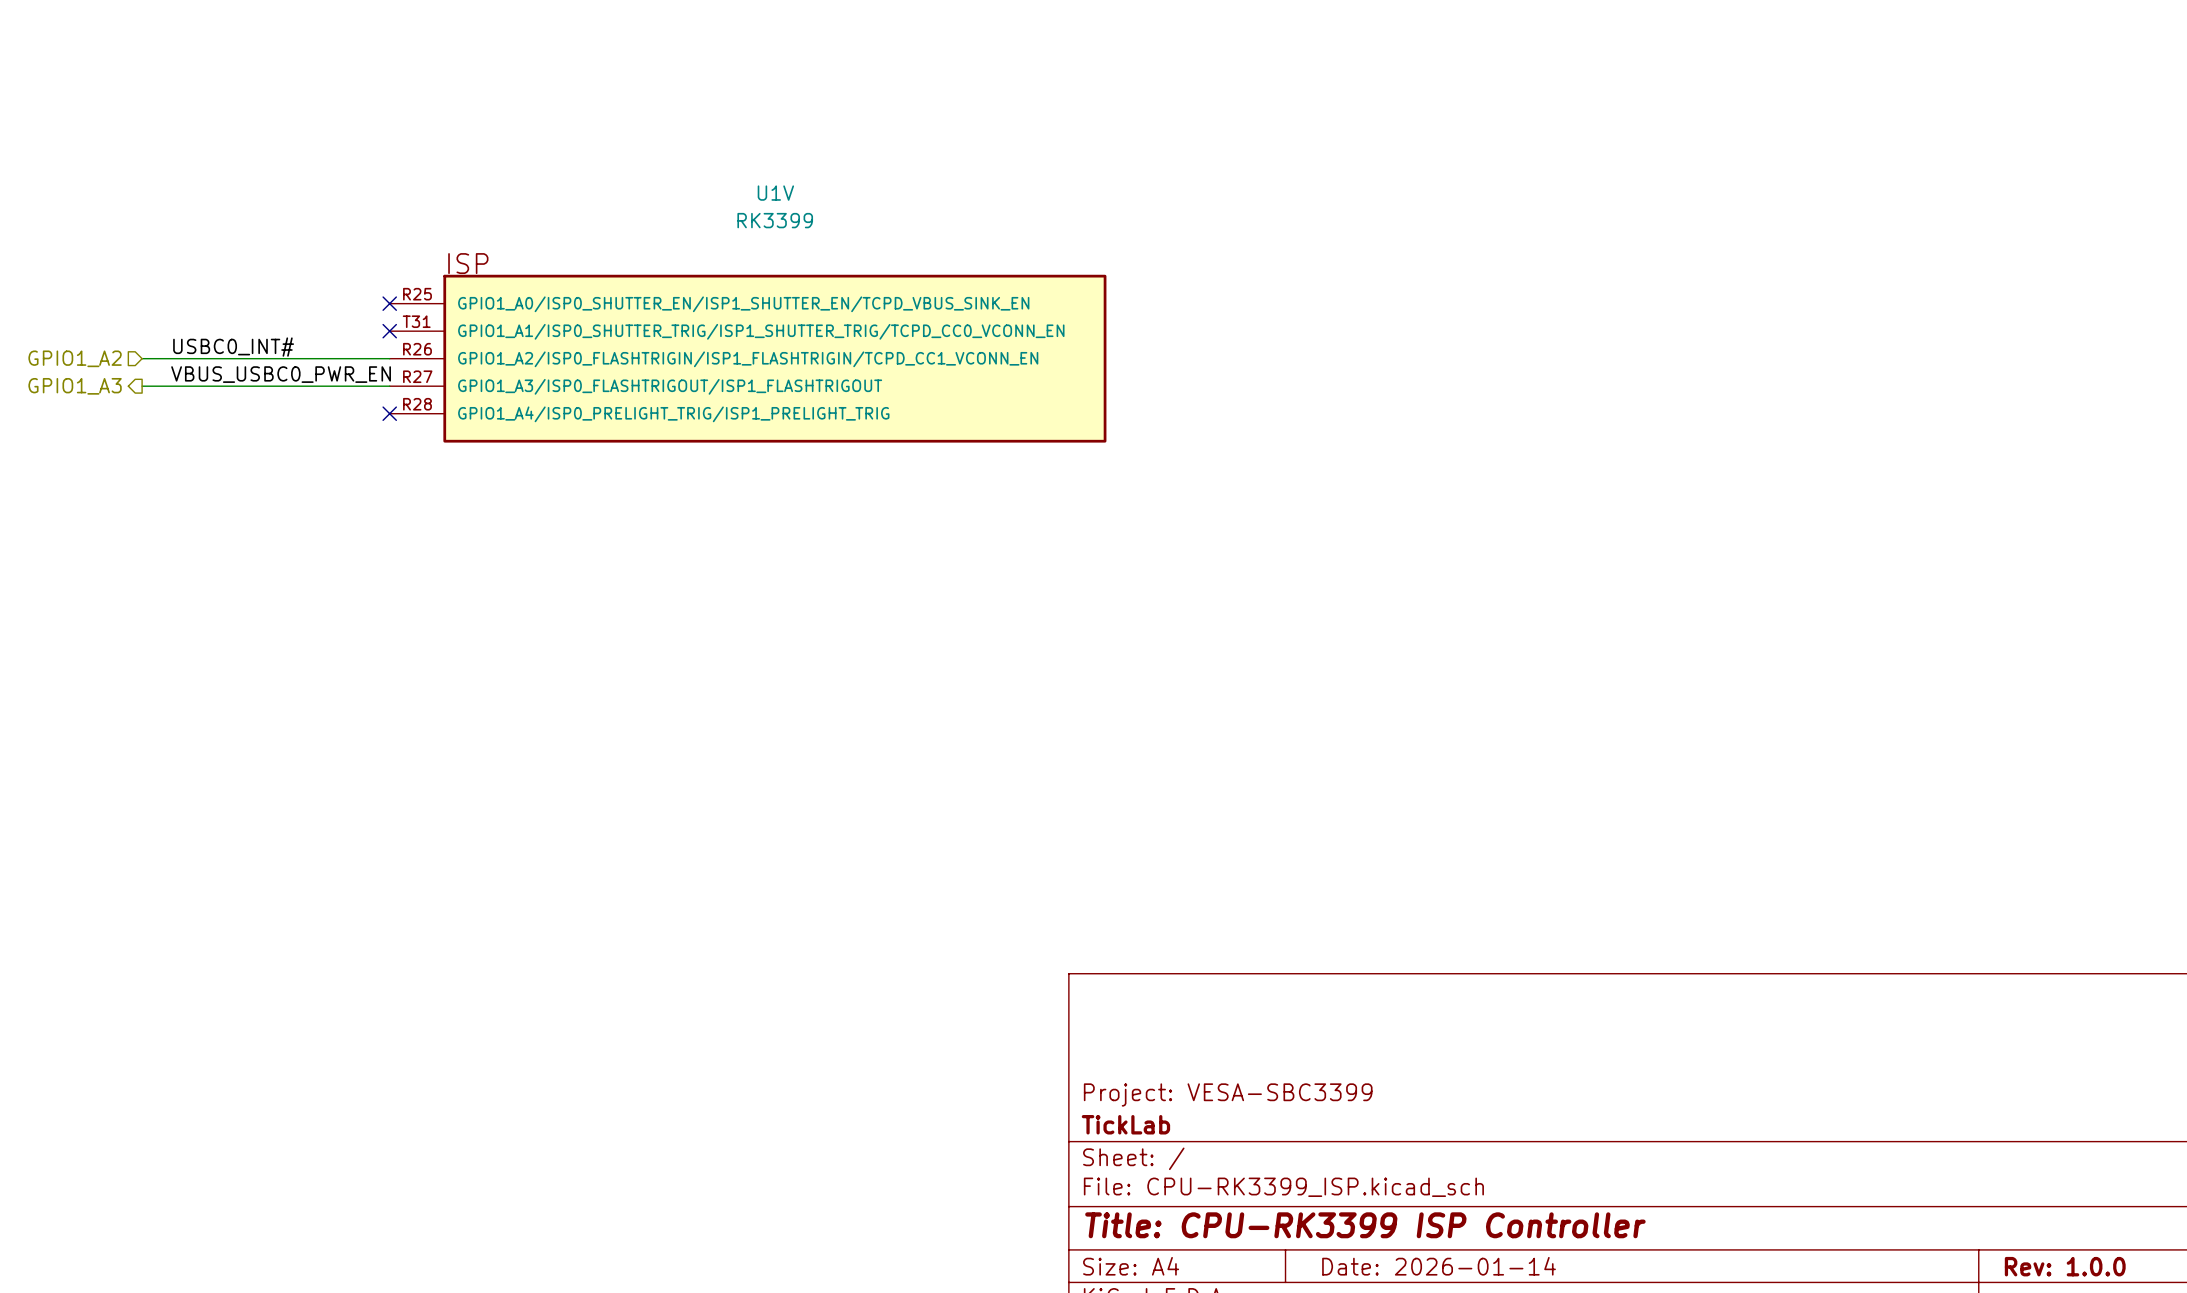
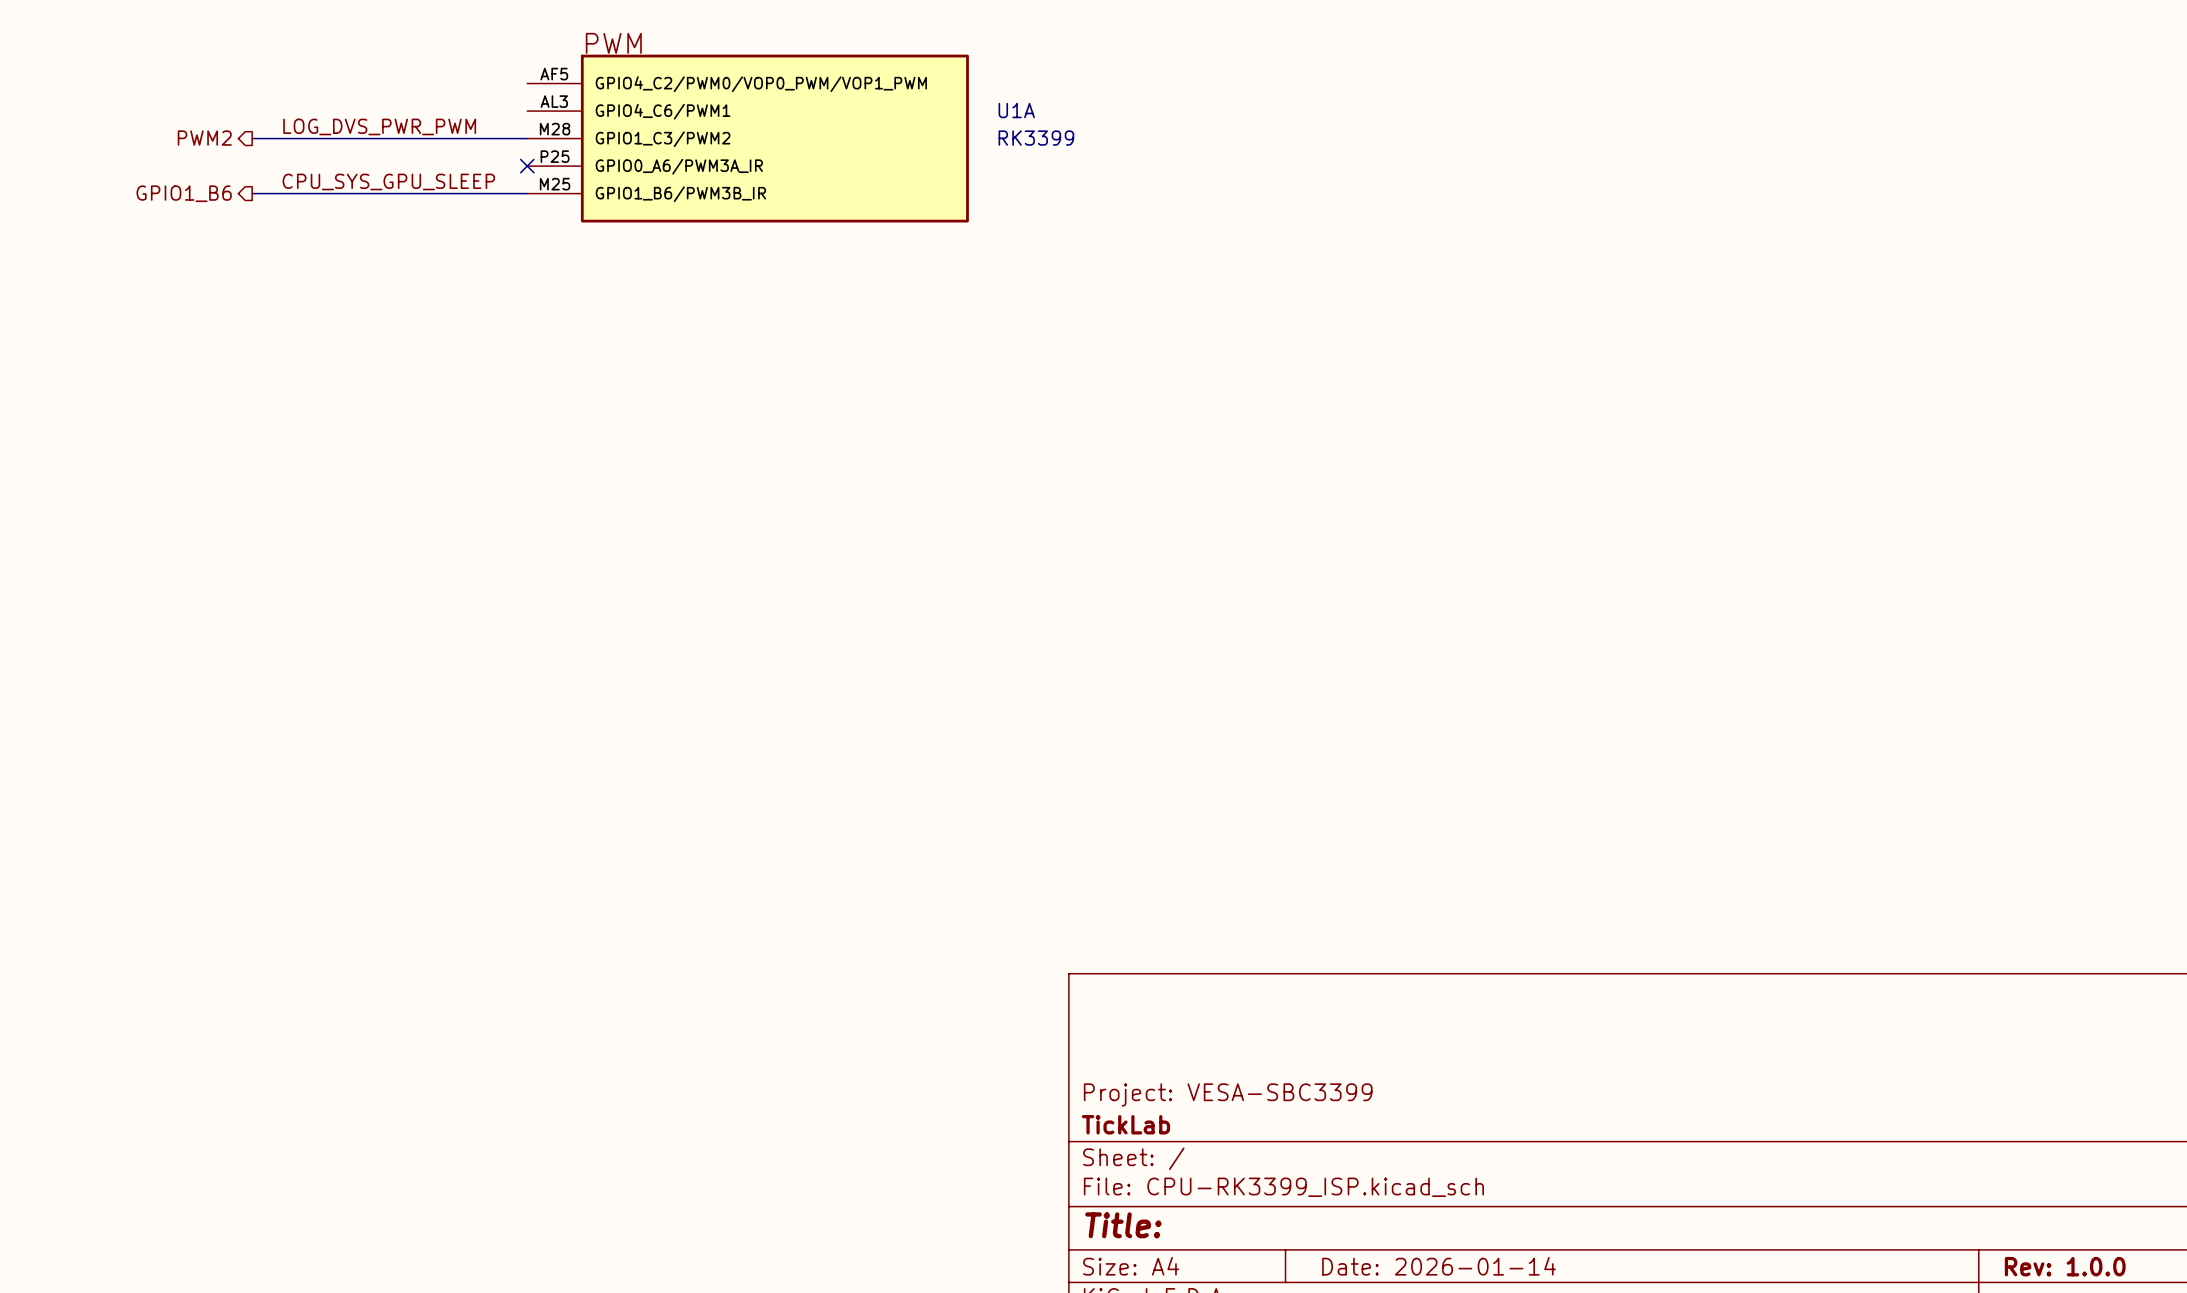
label: none -> LOG_DVS_PWR_PWM (379, 126)
hierarchical label: none -> PWM2 (204, 138)
wire: none -> (252, 138) (527, 138)
U1A: none -> RK3399 (748, 138)
no-connect mark: none -> (527, 166)
label: none -> CPU_SYS_GPU_SLEEP (388, 181)
hierarchical label: none -> GPIO1_B6 (184, 193)
wire: none -> (252, 193) (527, 193)
no-connect mark: (389, 303) -> none
no-connect mark: (389, 331) -> none
label: USBC0_INT# (233, 347) -> none
hierarchical label: GPIO1_A2 (75, 358) -> none
wire: (142, 358) (389, 358) -> none
U1V: RK3399 (748, 358) -> none
label: VBUS_USBC0_PWR_EN (281, 374) -> none
hierarchical label: GPIO1_A3 (75, 386) -> none
wire: (142, 386) (389, 386) -> none
no-connect mark: (389, 413) -> none
title block: Title: CPU-RK3399 ISP Controller (1365, 1225) -> Title: (1123, 1225)

